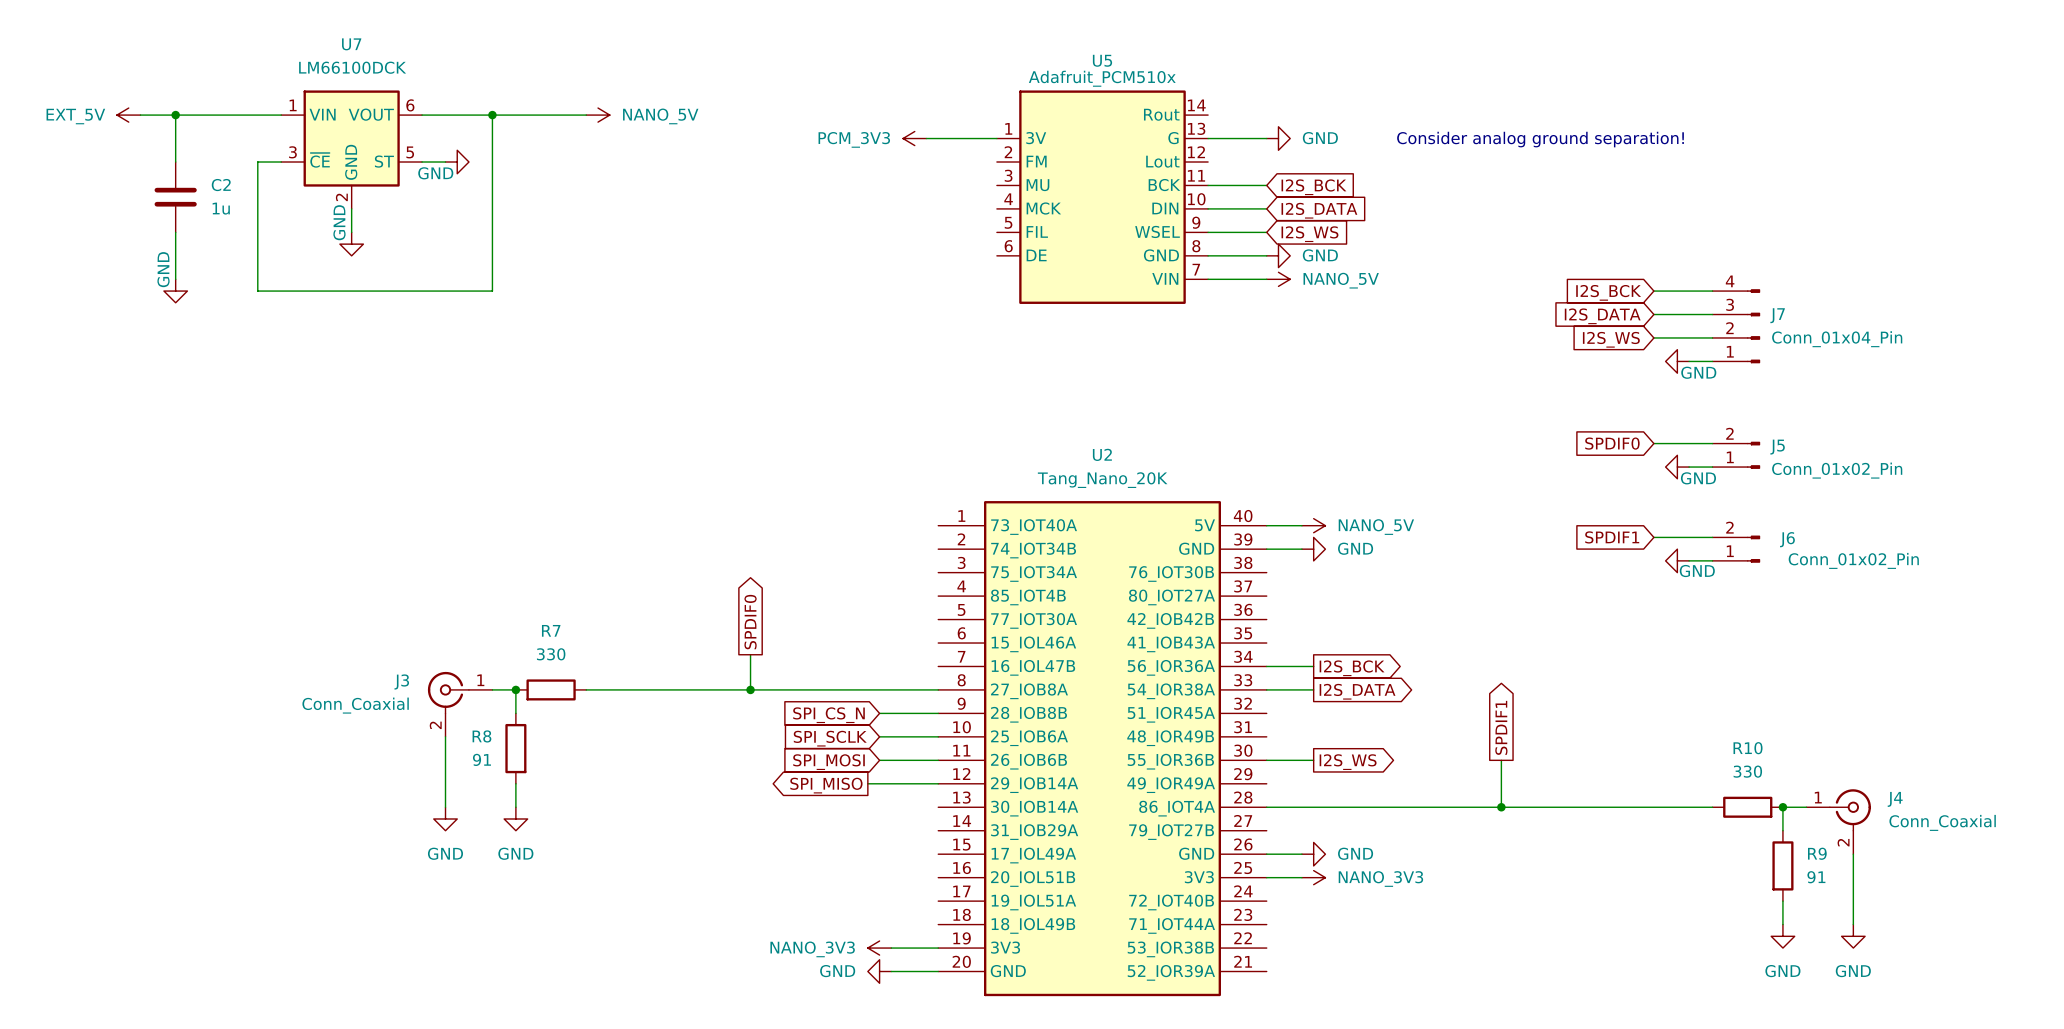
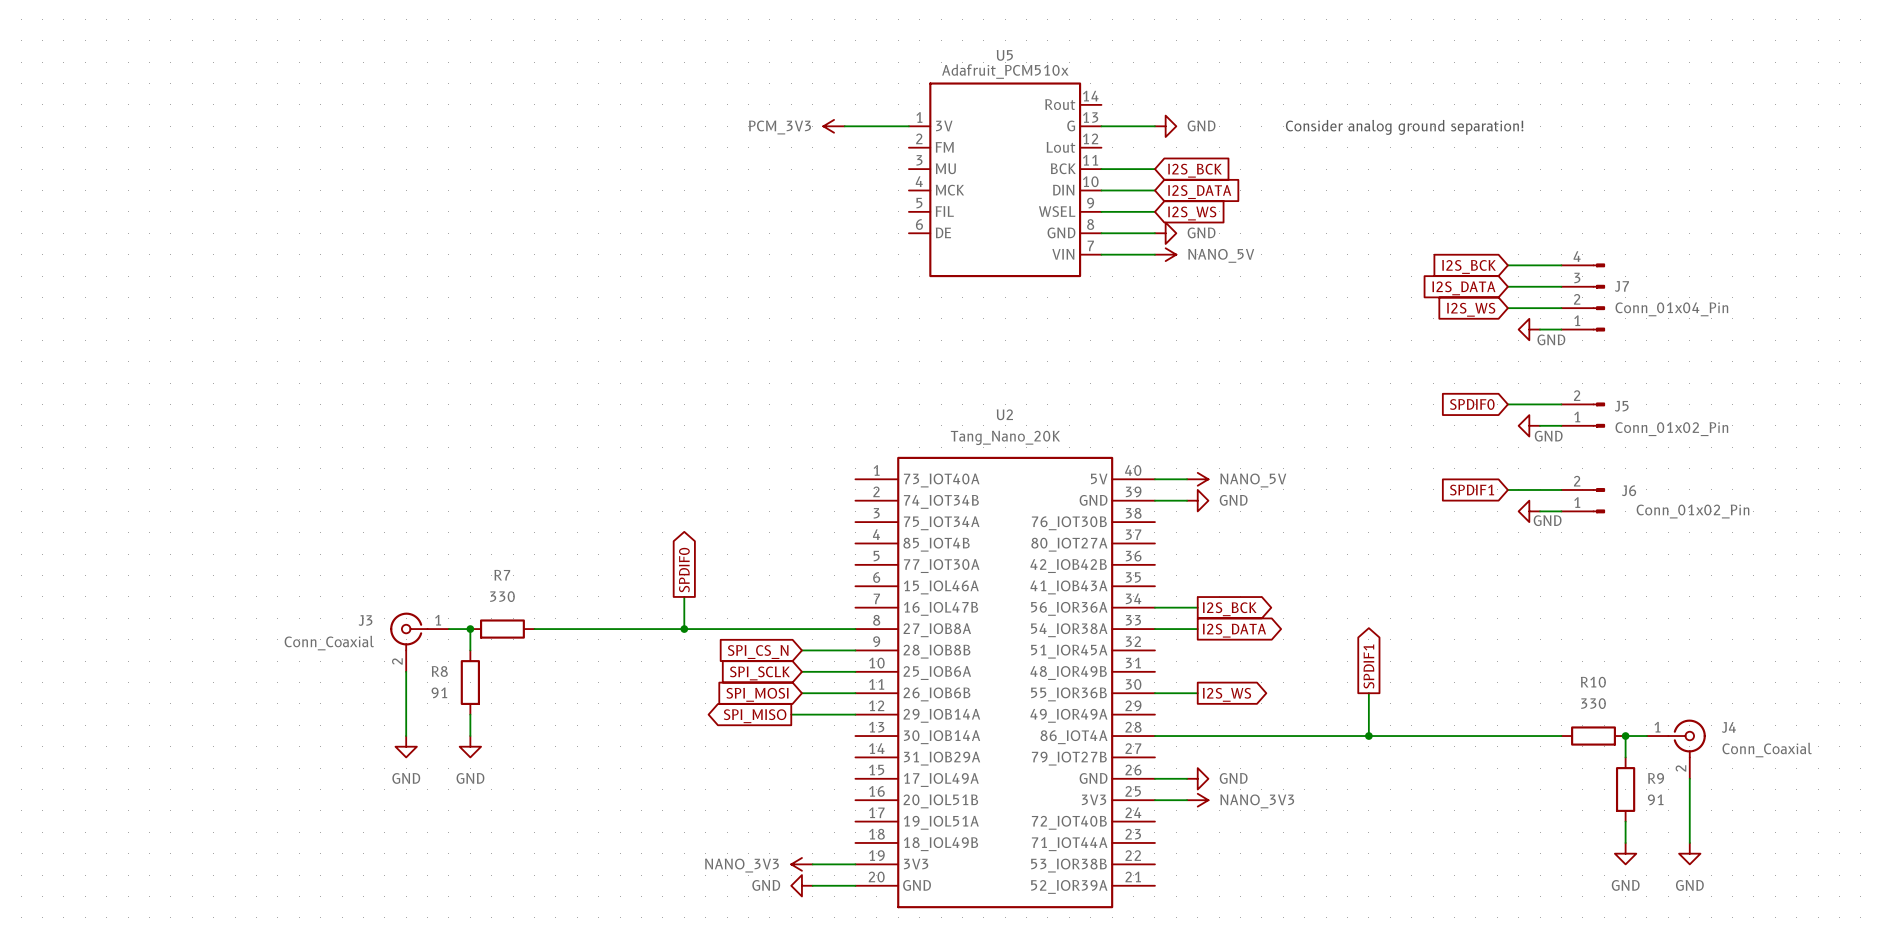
power symbol: EXT_5V (128, 115) -> none
wire: (140, 115) (281, 115) -> none
wire: (175, 115) (175, 162) -> none
junction: (175, 115) -> none
wire: (422, 115) (586, 115) -> none
wire: (492, 115) (492, 291) (257, 291) (257, 162) (281, 162) -> none
junction: (492, 115) -> none
power symbol: NANO_5V (598, 115) -> none
U7: LM66100DCK (351, 149) -> none
wire: (422, 162) (445, 162) -> none
power symbol: GND (457, 162) -> none
C2: 1u (175, 197) -> none
wire: (351, 208) (351, 232) -> none
wire: (175, 232) (175, 279) -> none
power symbol: GND (351, 244) -> none
power symbol: GND (175, 291) -> none

